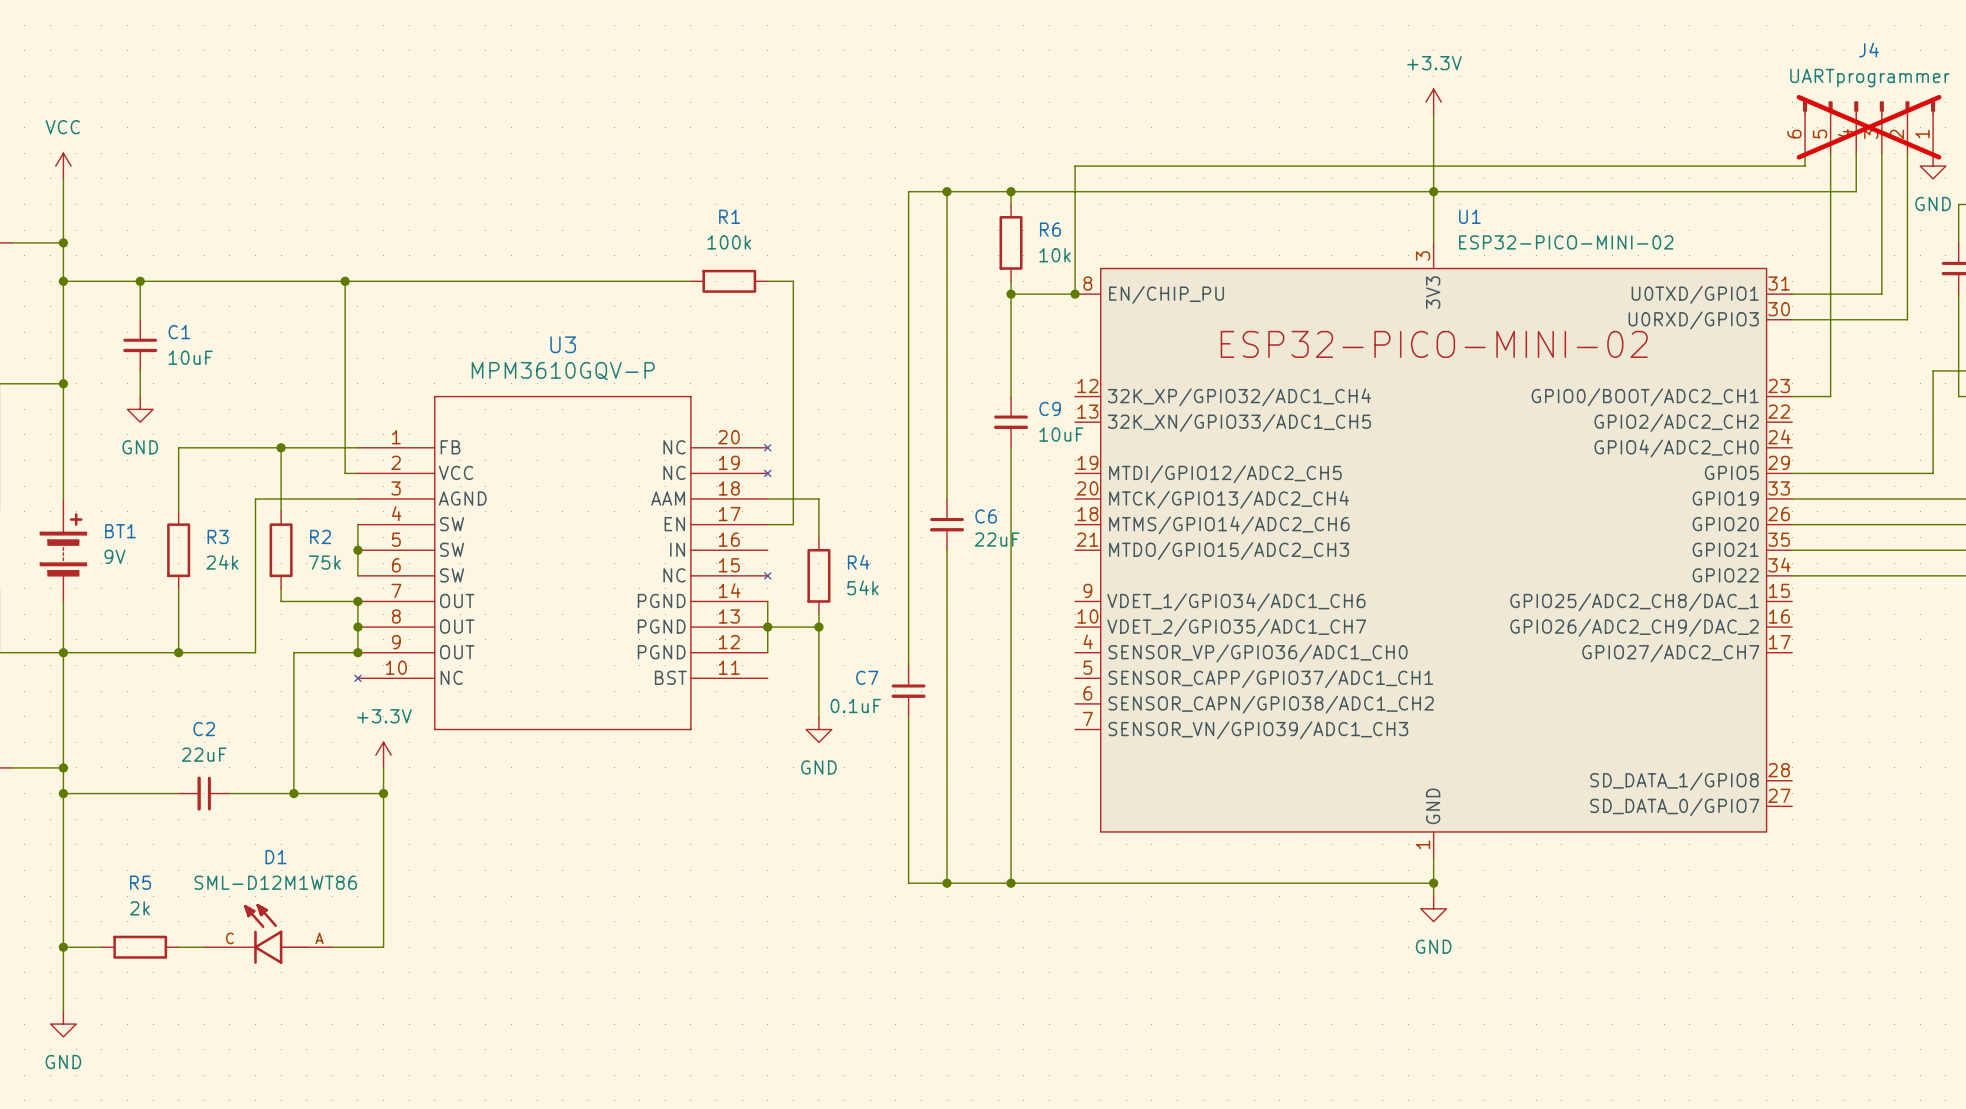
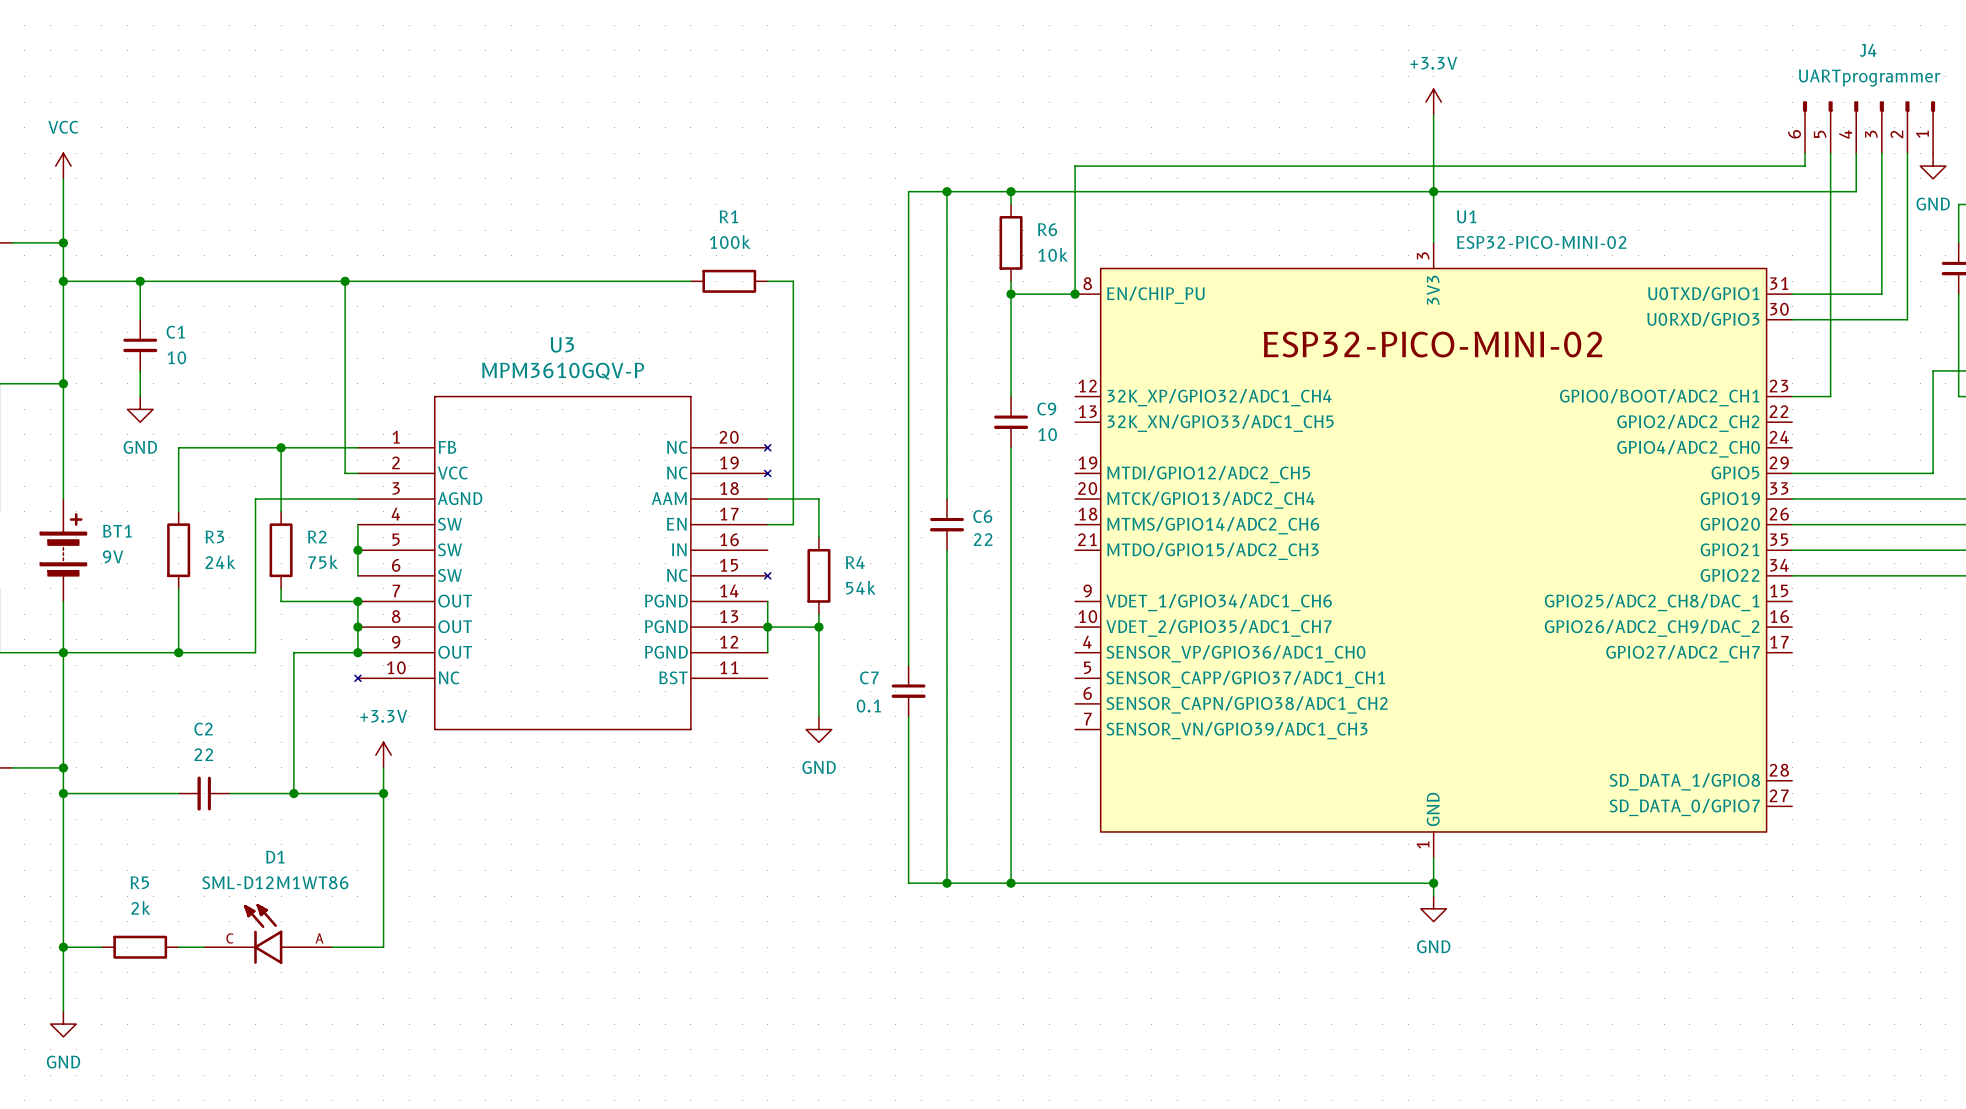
J4 do-not-place cross: (1869, 127) -> none
C1 value: 10uF (190, 357) -> 10 (176, 357)
C9 value: 10uF (1061, 434) -> 10 (1047, 434)
C6 value: 22uF (997, 539) -> 22 (983, 539)
C7 value: 0.1uF (855, 706) -> 0.1 (868, 706)
C2 value: 22uF (204, 754) -> 22 (203, 754)

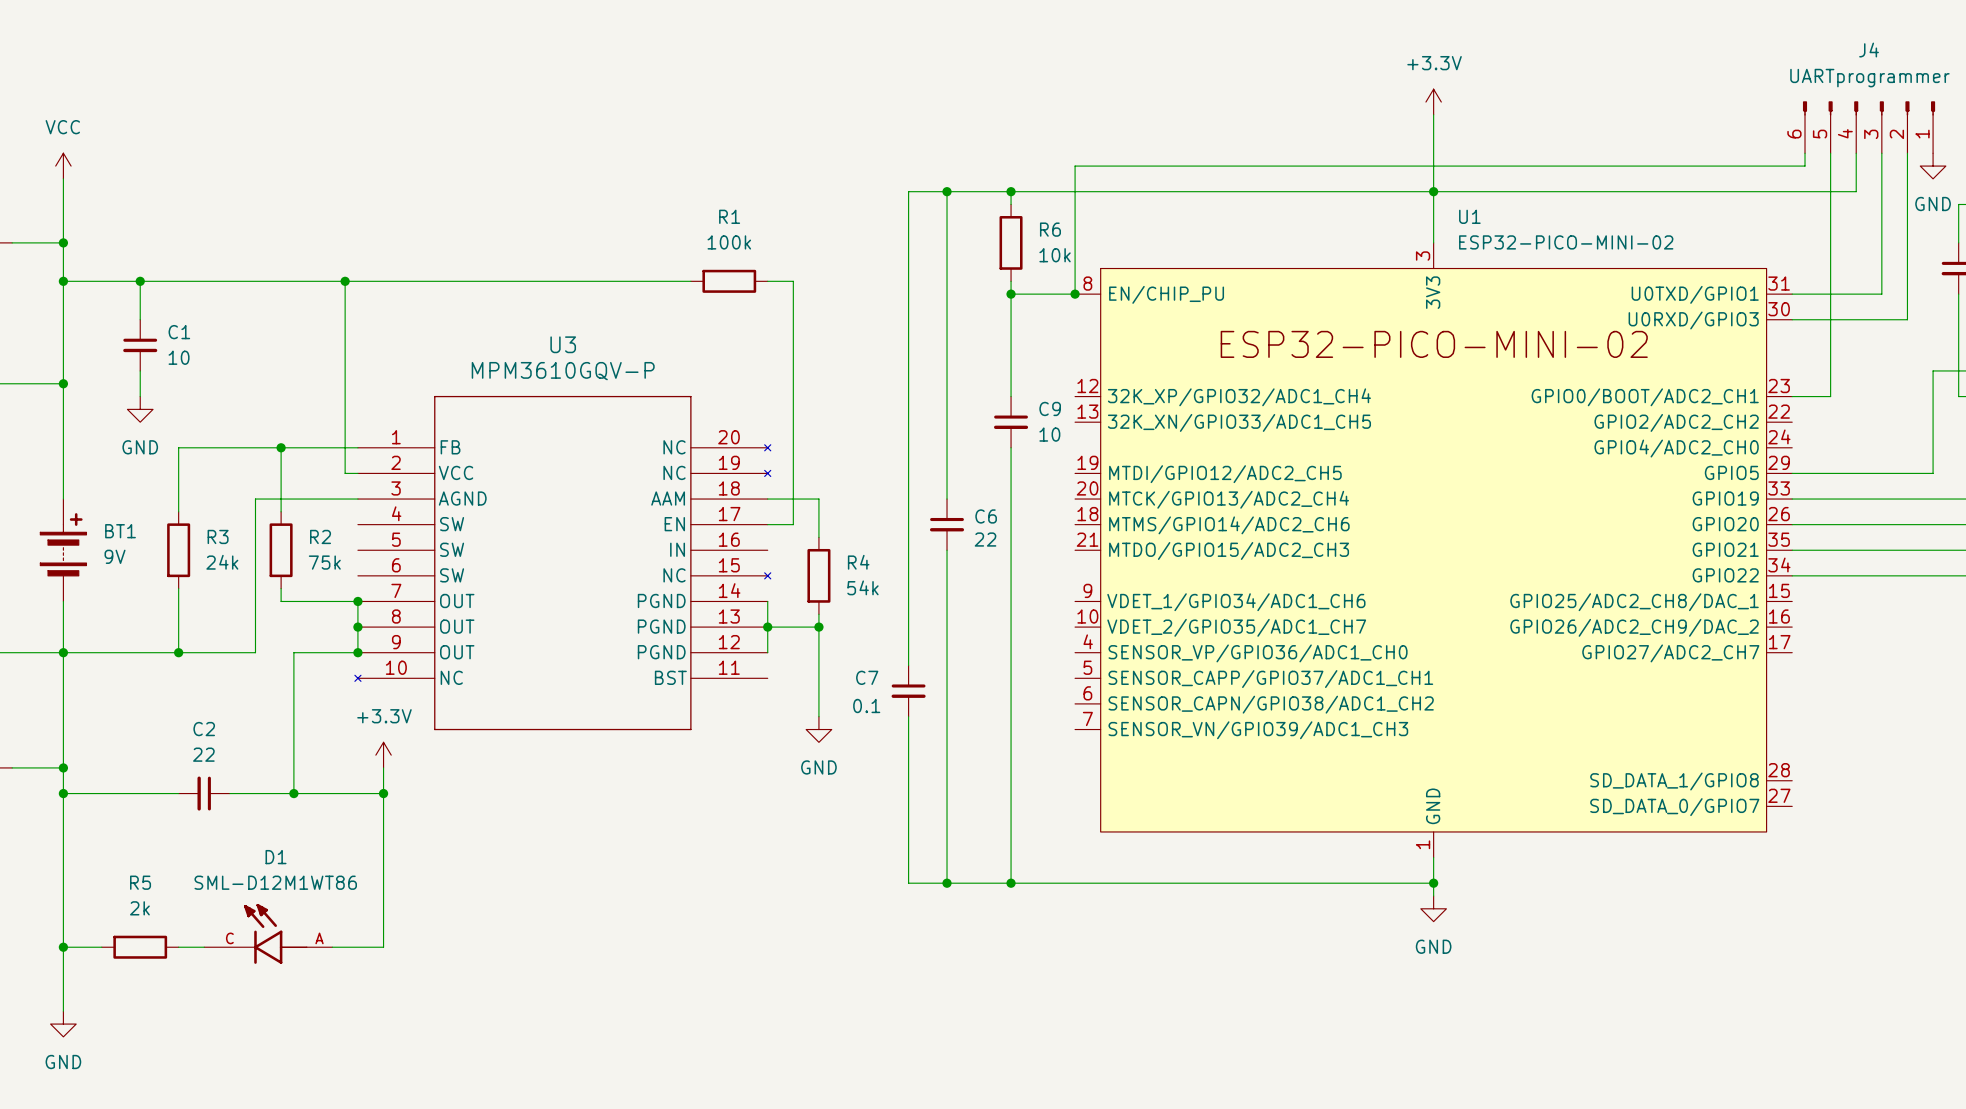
wire: (357, 524) (357, 575) -> none
junction: (357, 550) -> none

